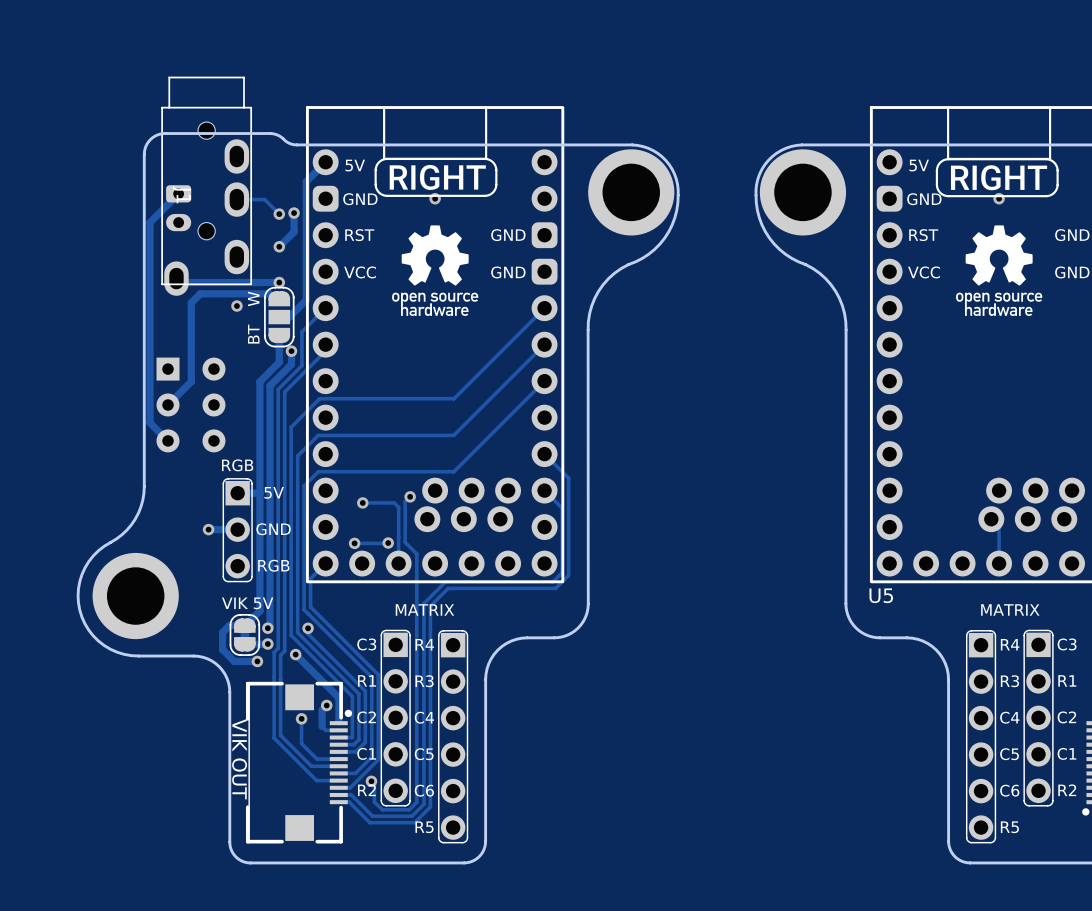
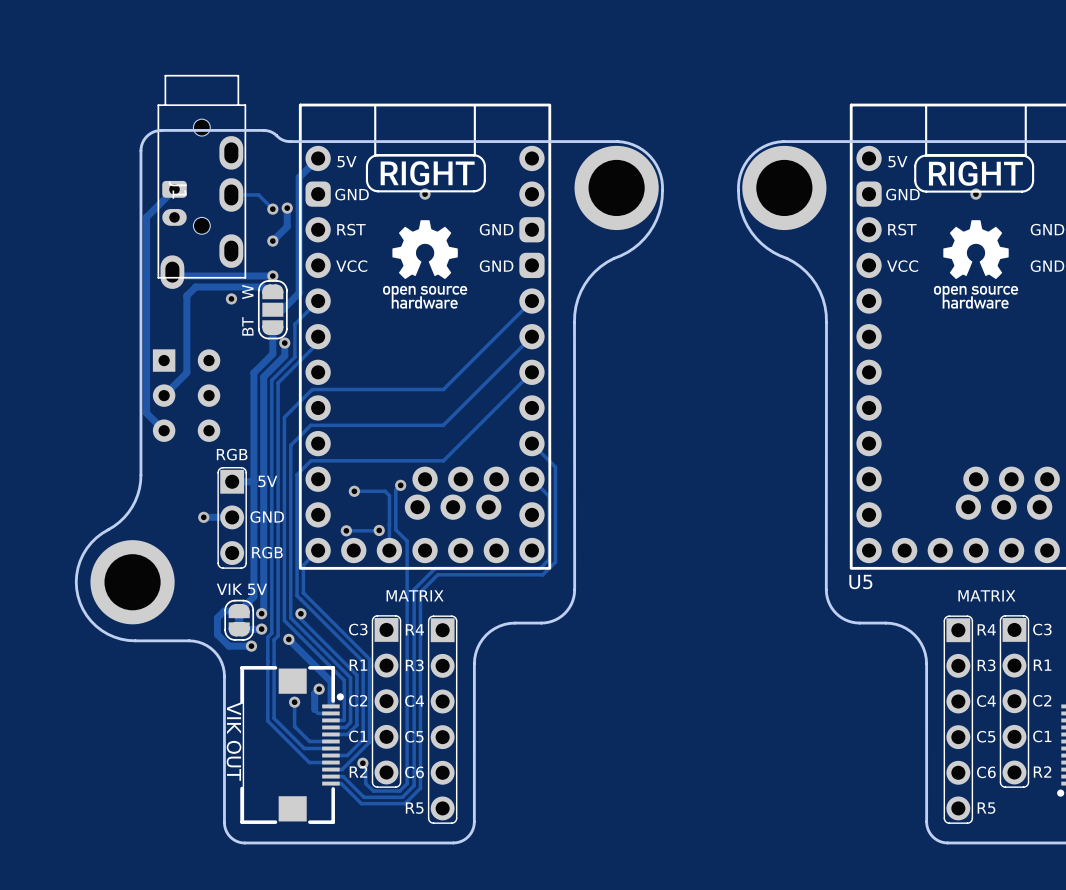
track: (999, 526) (999, 563) -> none

